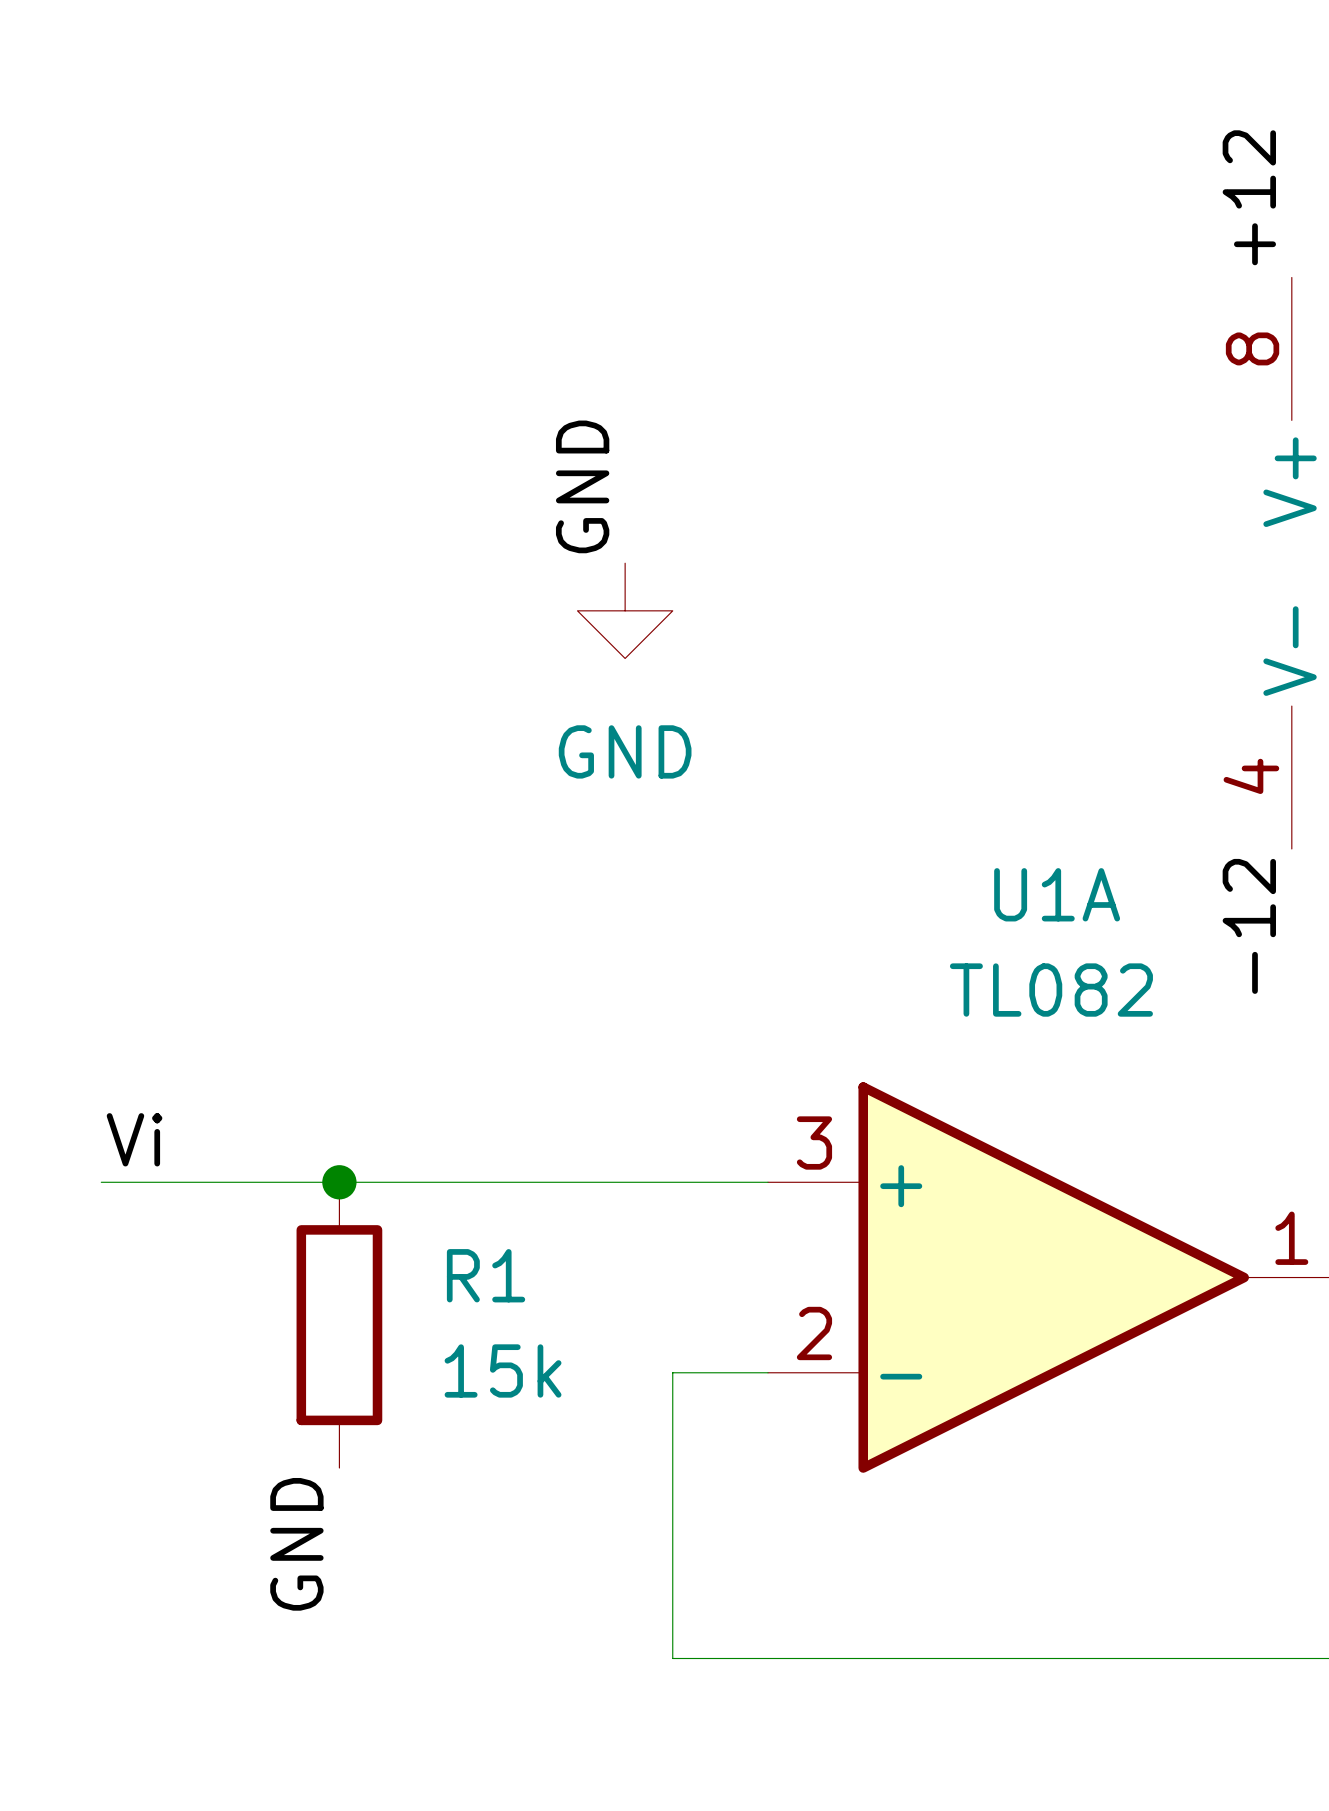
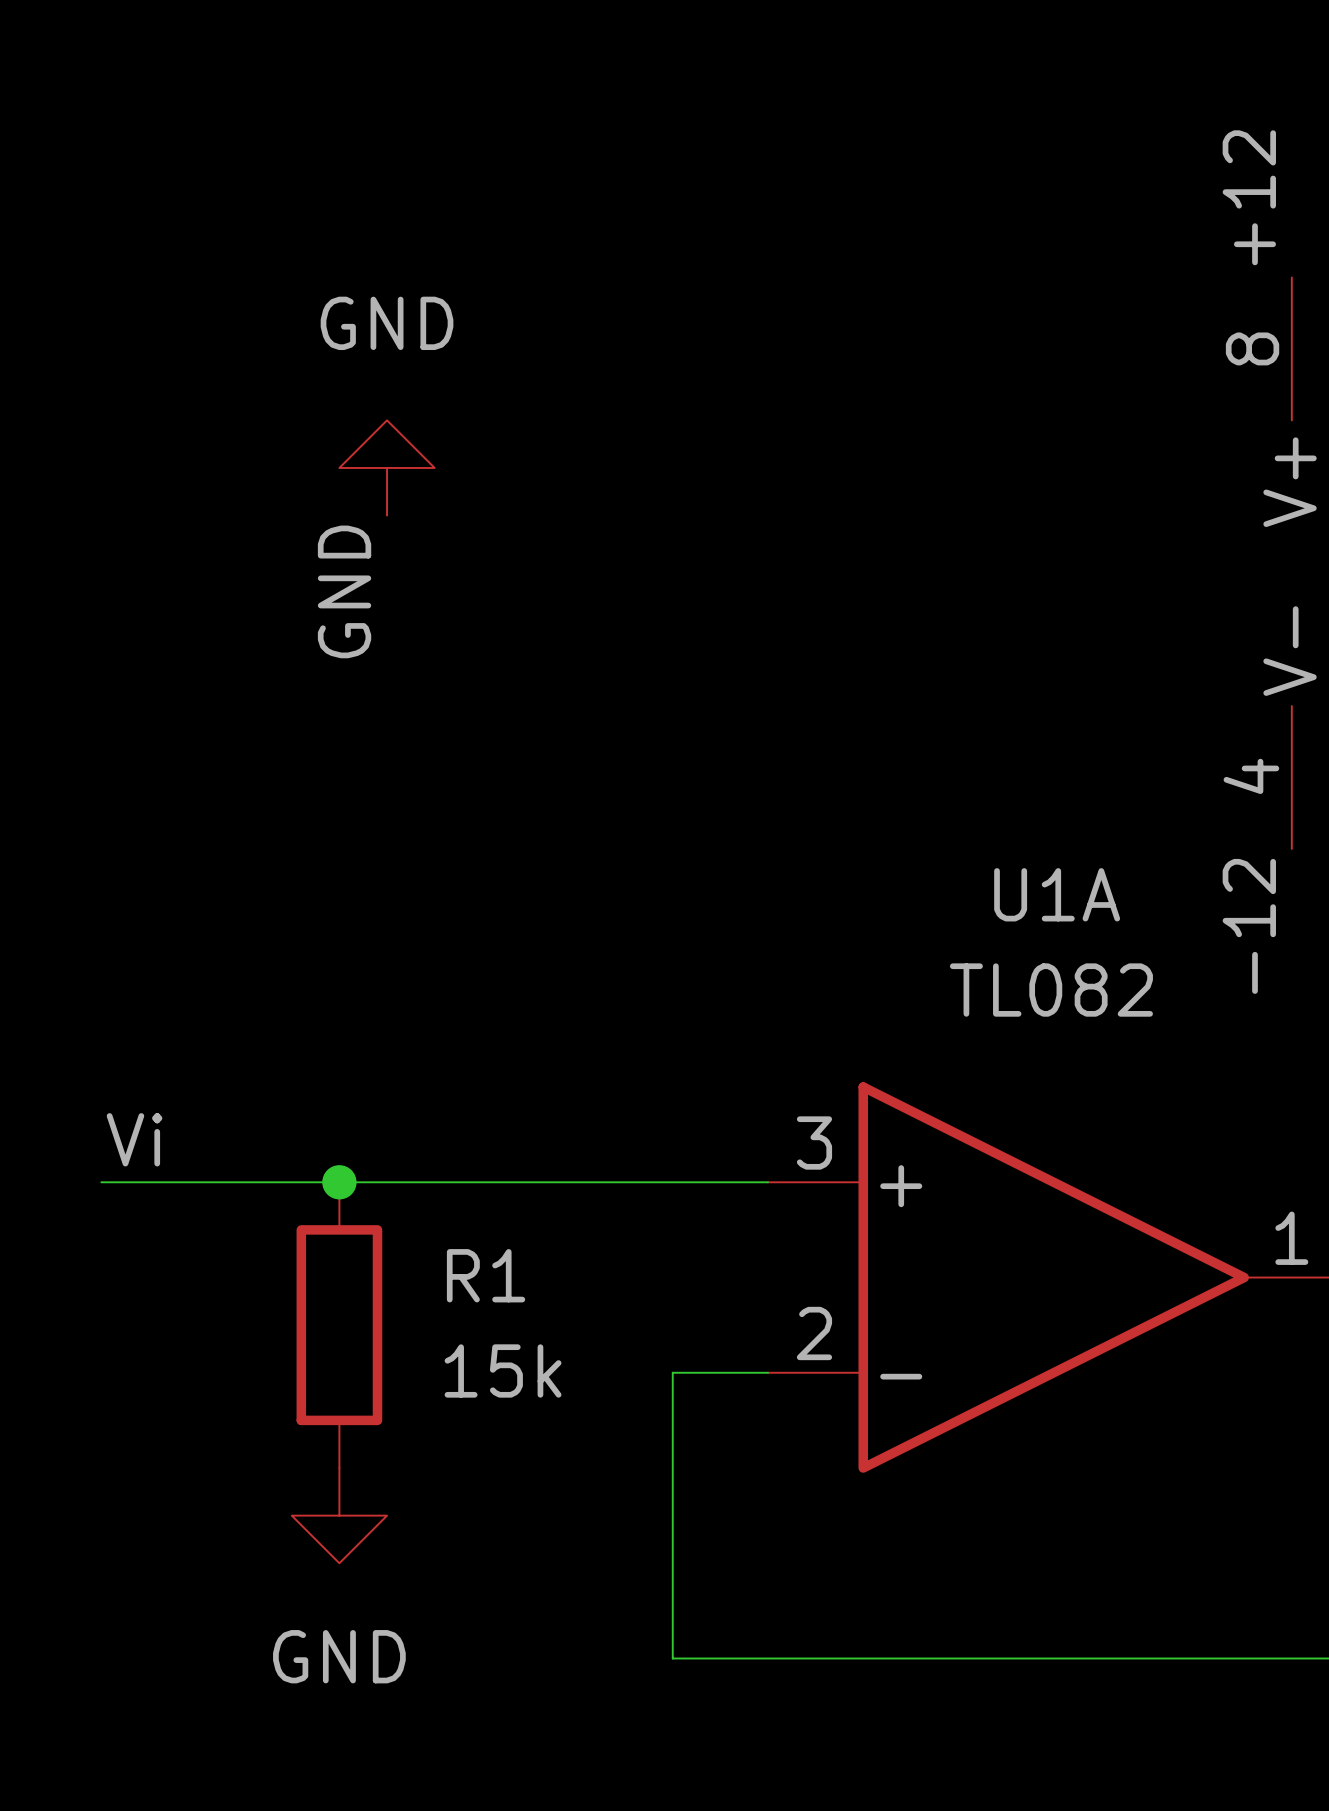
label position: GND (582, 486) -> GND (344, 591)
power symbol rotation: 0° (625, 610) -> 180° (387, 467)
power symbol position: GND (625, 610) -> GND (387, 467)
power symbol: none -> GND (339, 1515)
label: GND (296, 1544) -> none

